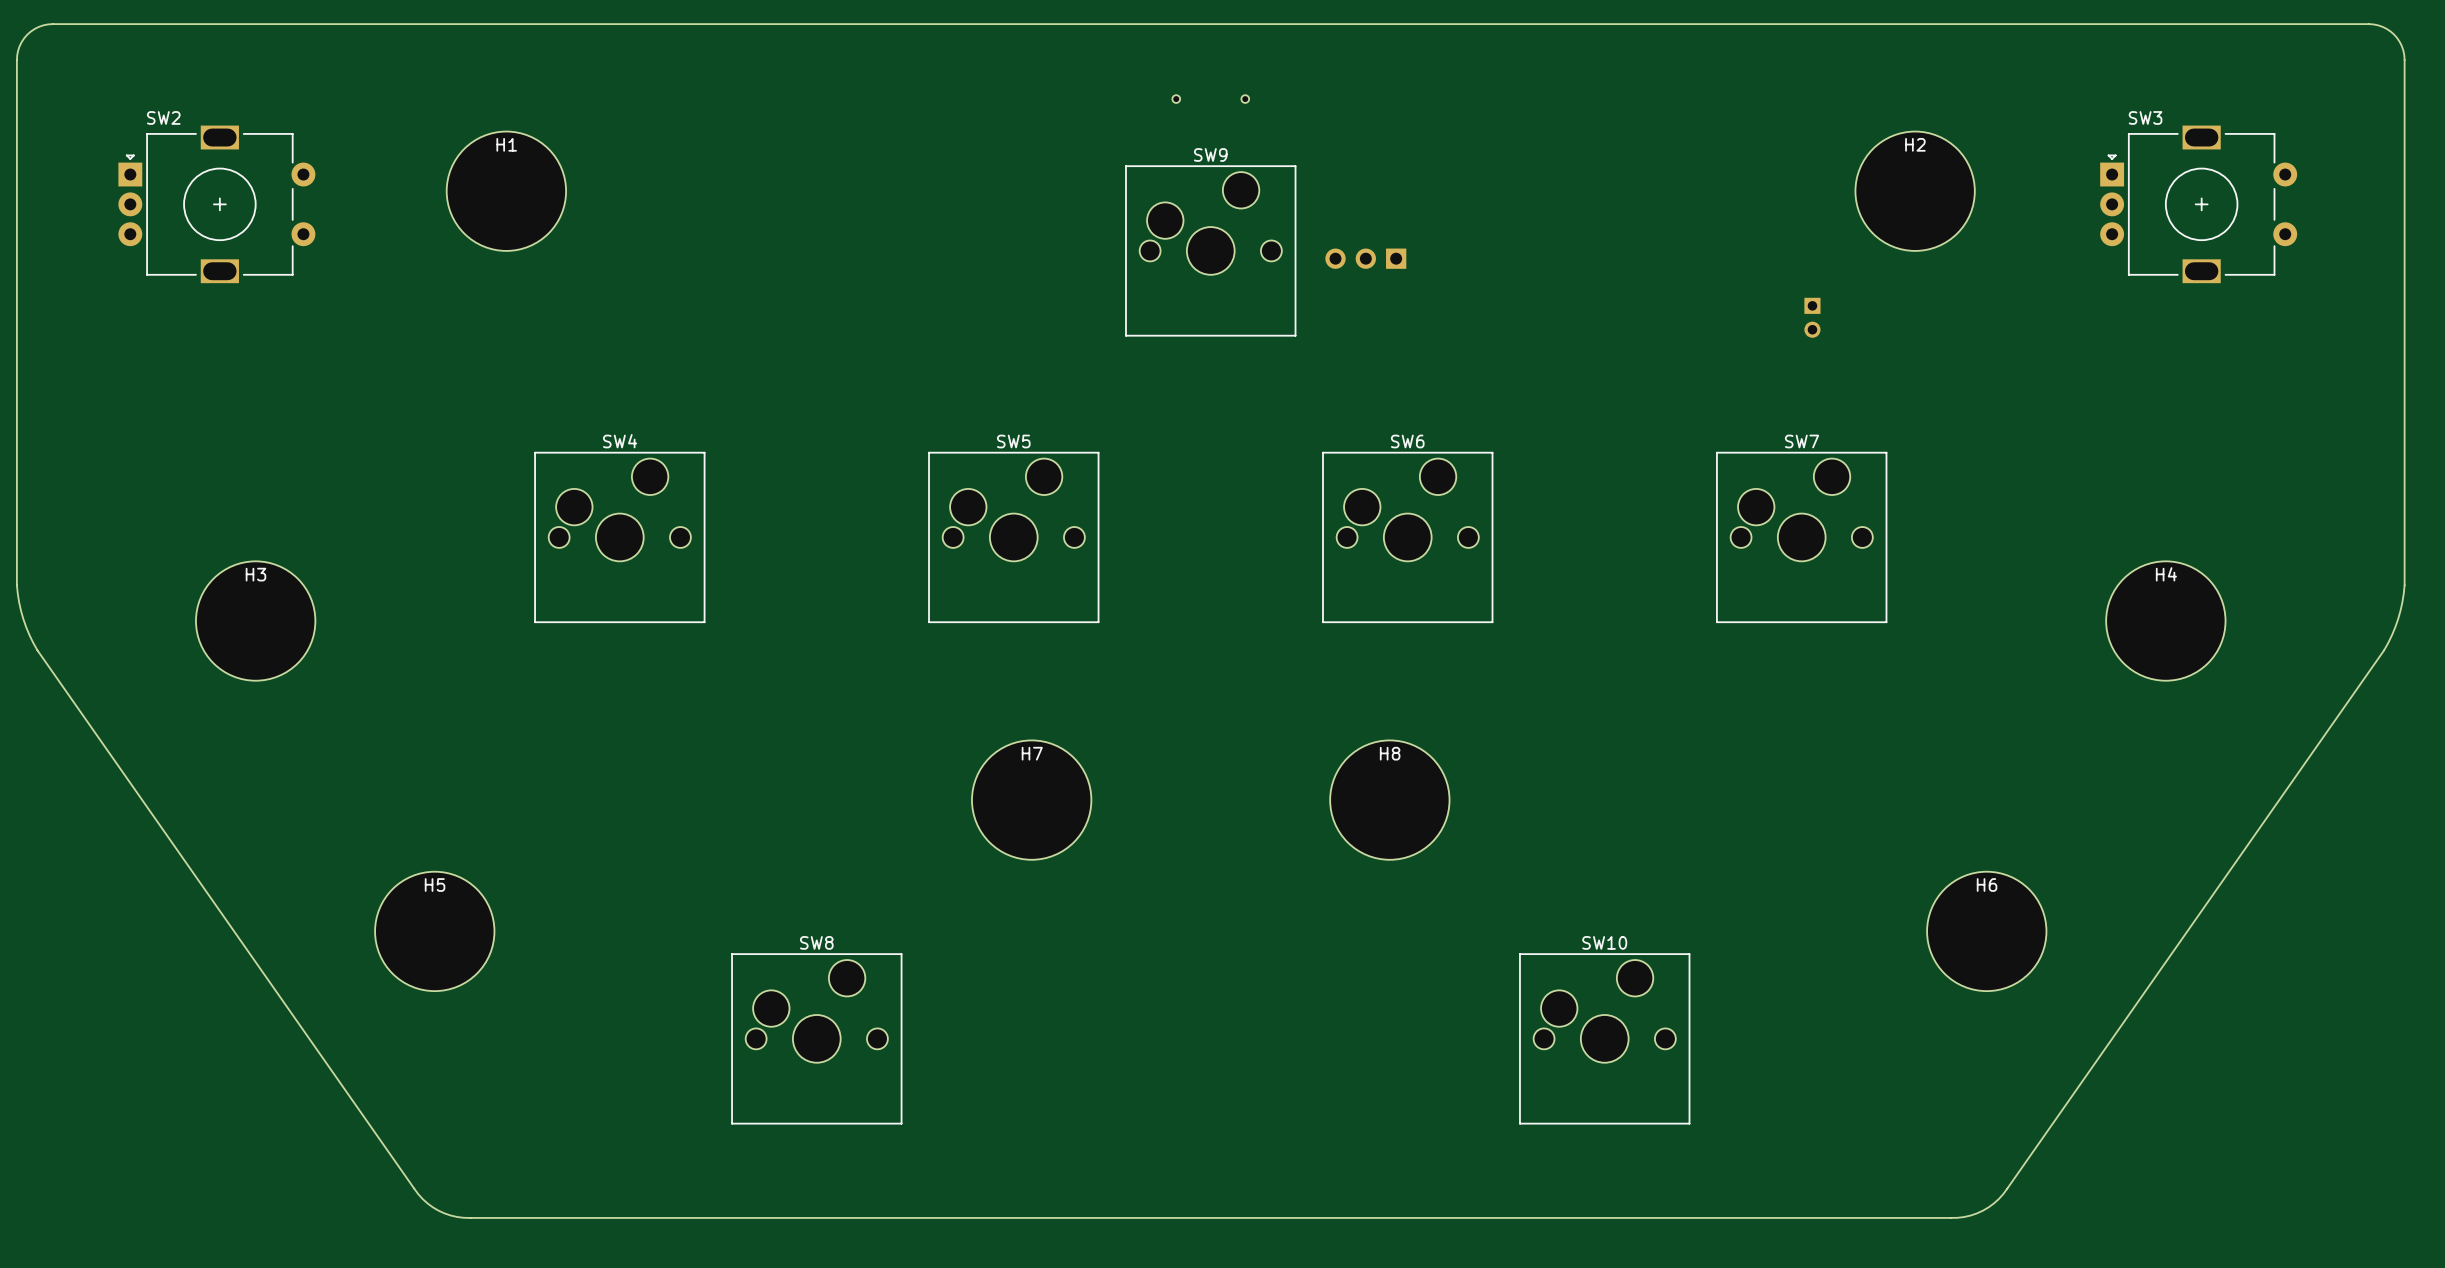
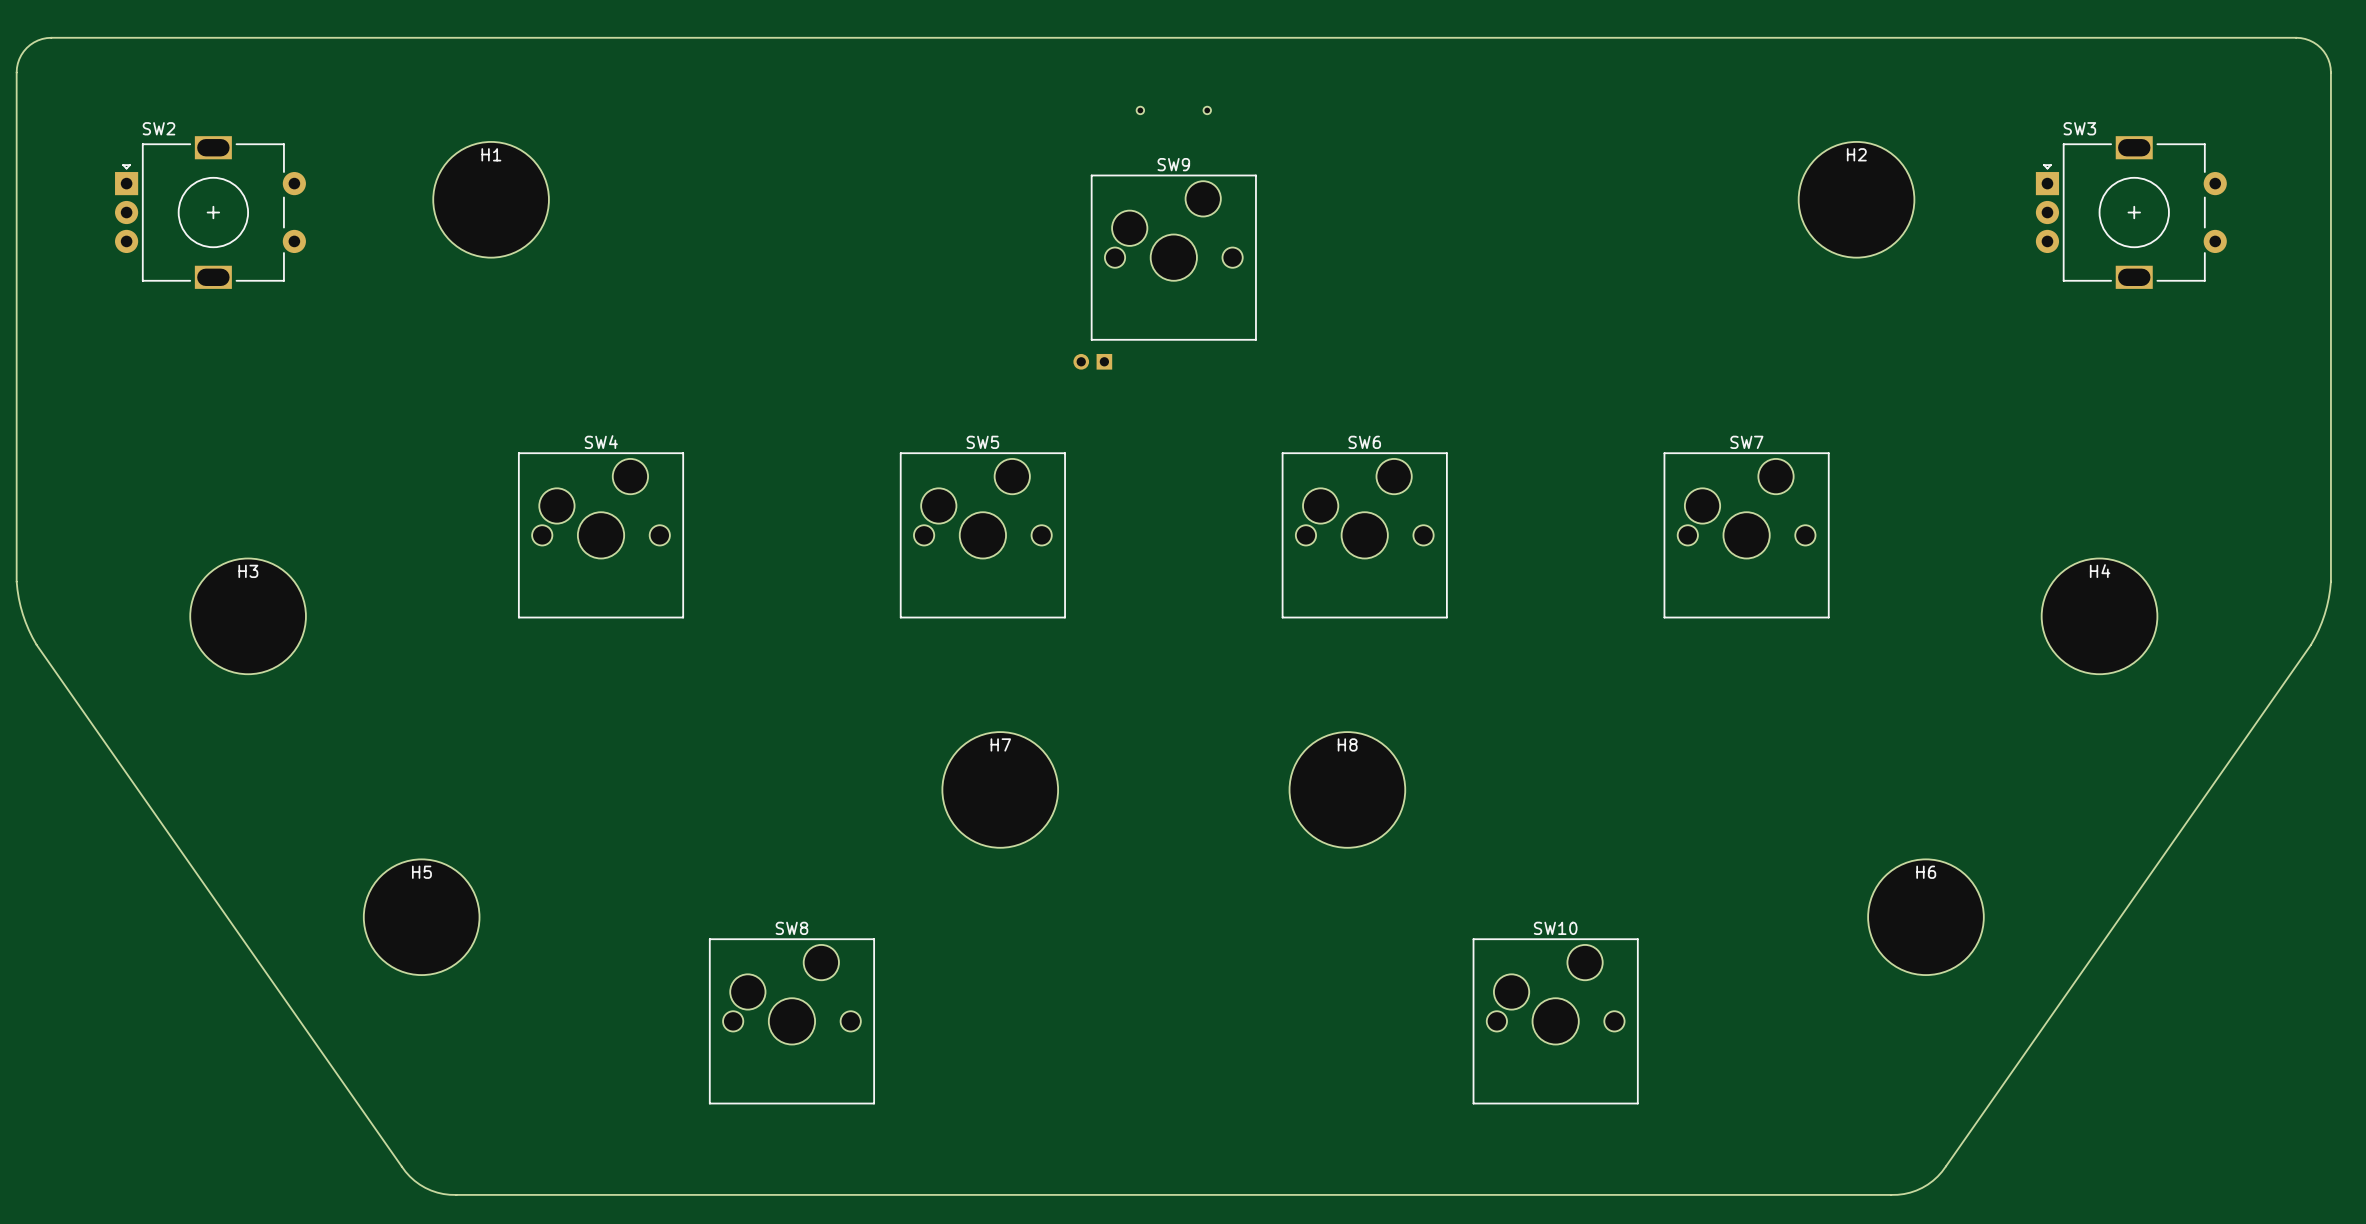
part: (1365, 258) -> none
part: (1812, 317) -> none
part: none -> (1092, 361)

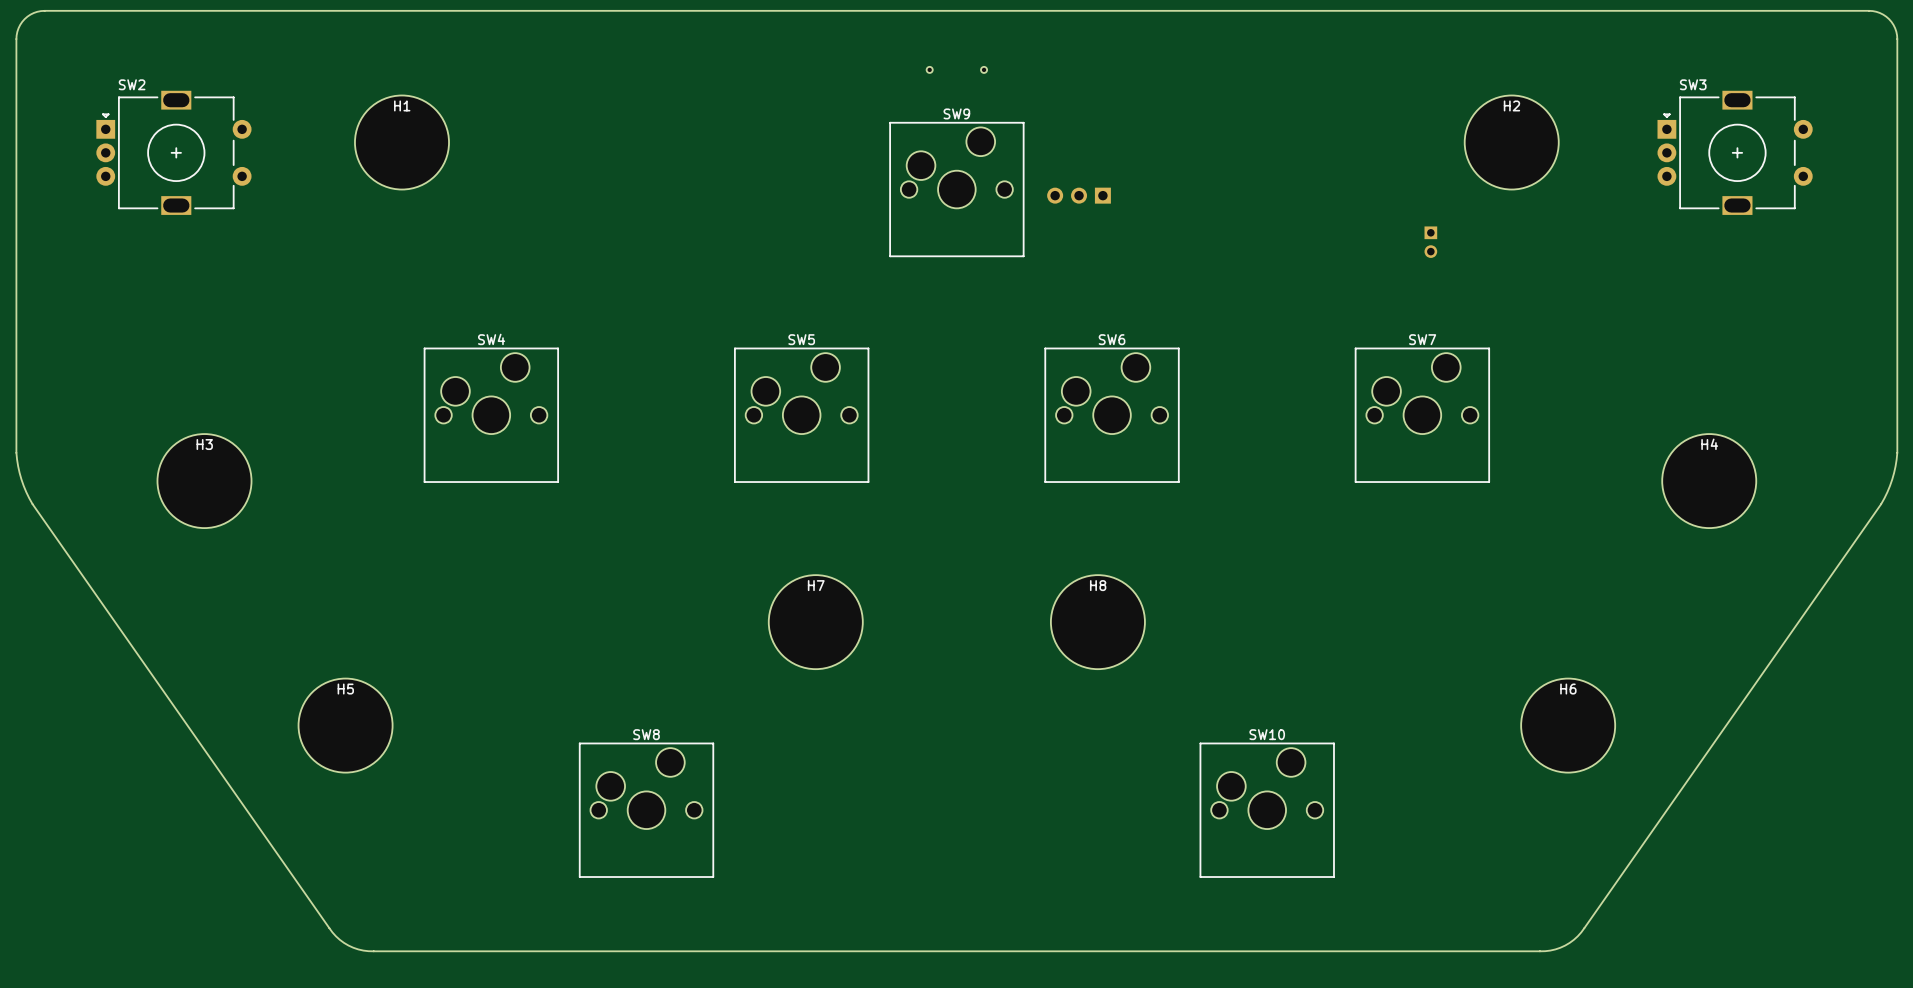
part: none -> (1079, 195)
part: none -> (1430, 242)
part: (1092, 361) -> none

